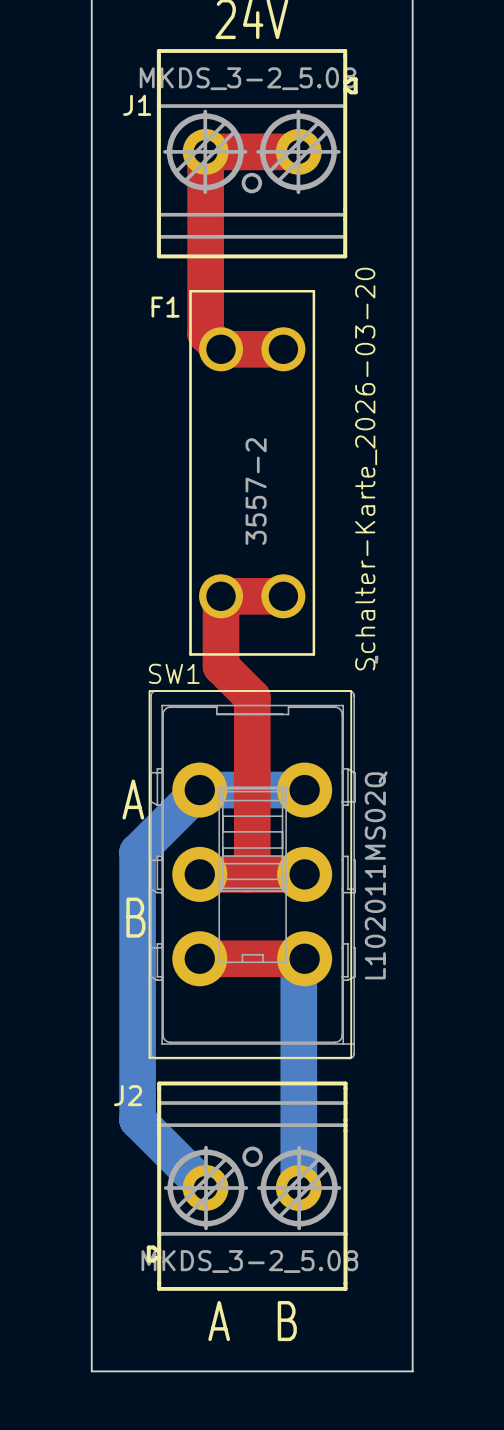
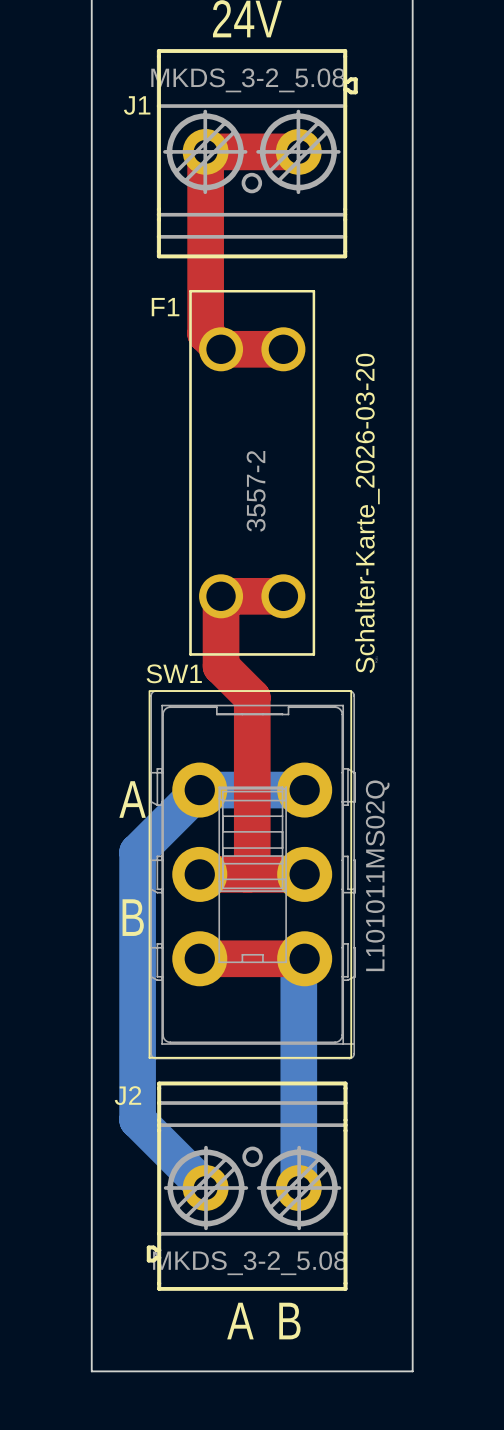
SW1 value: L102011MS02Q (376, 875) -> L101011MS02Q (377, 875)

